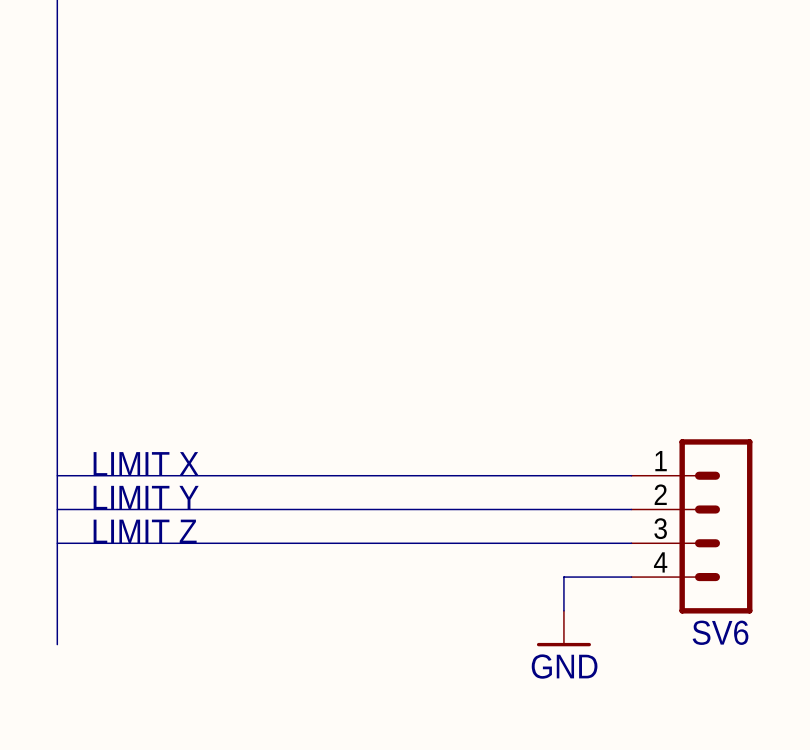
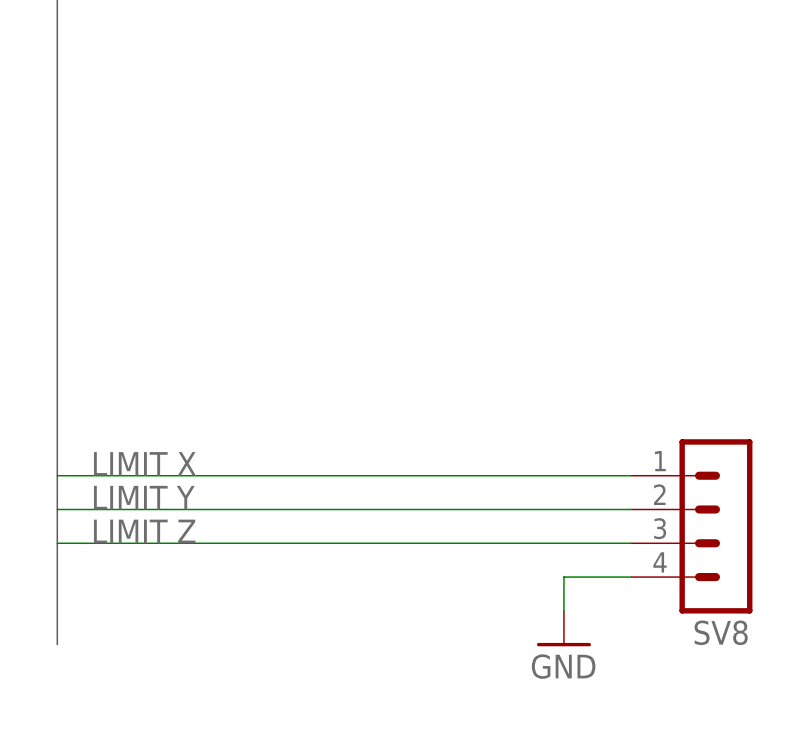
SV6 name: SV6 (720, 632) -> SV8 (721, 632)

